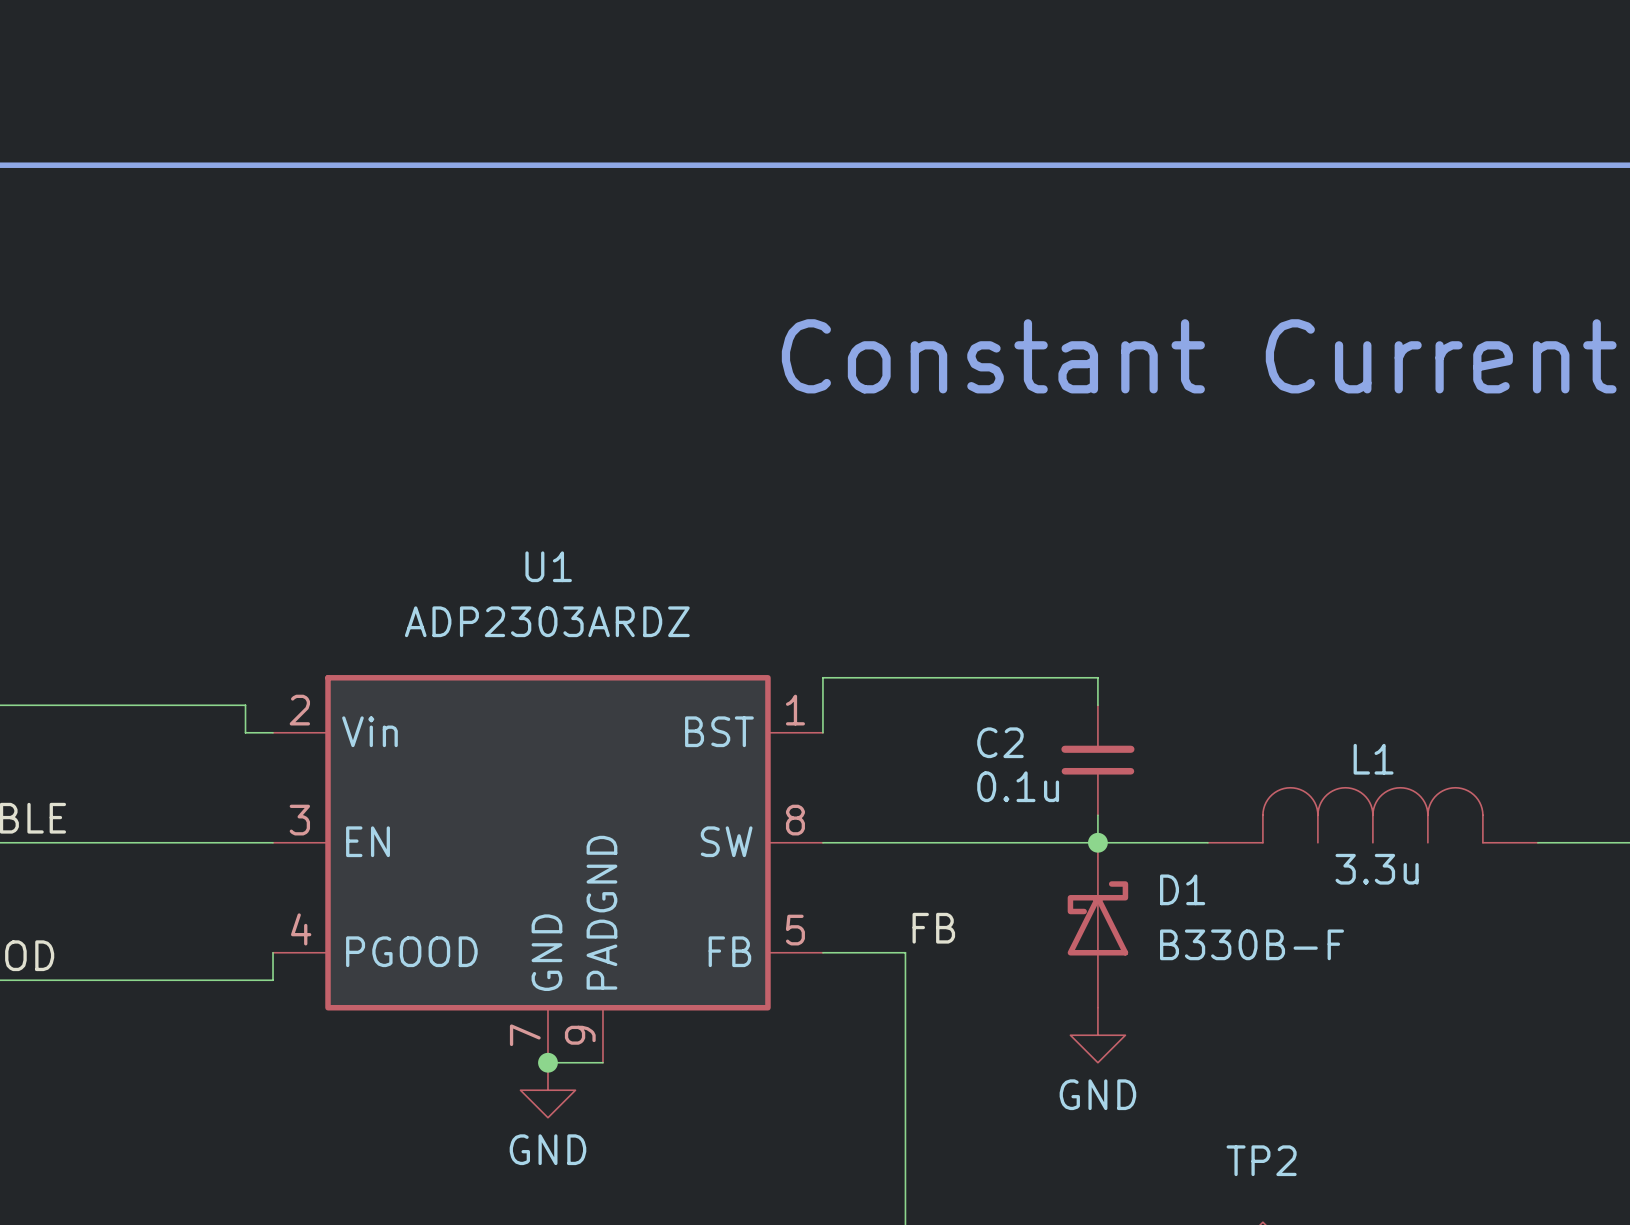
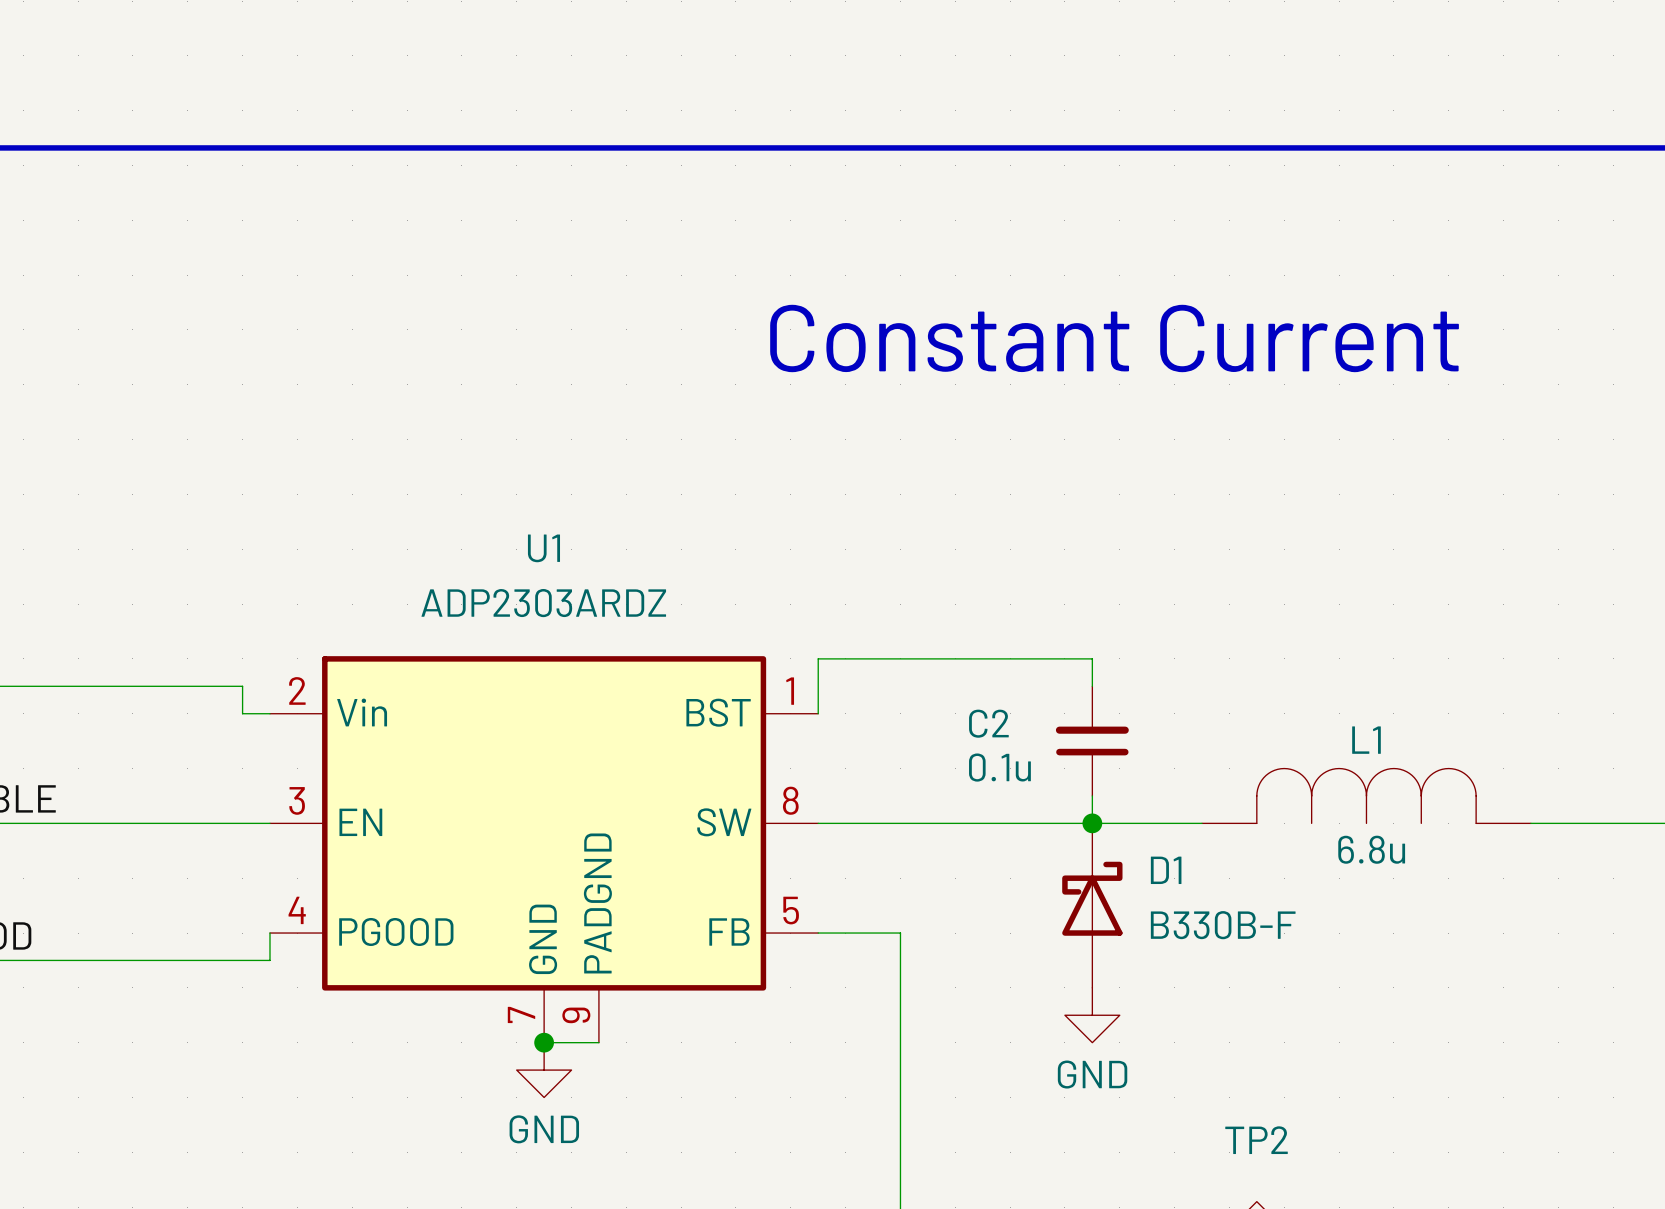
L1 value: 3.3u (1377, 869) -> 6.8u (1371, 849)
label: FB (933, 928) -> none

